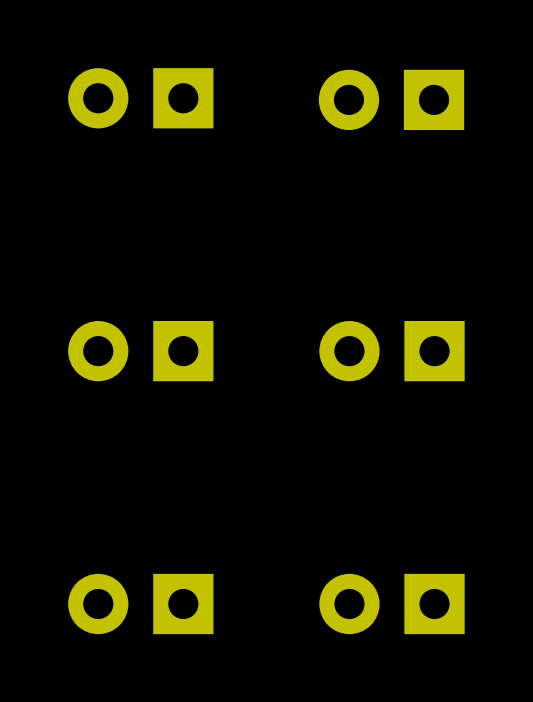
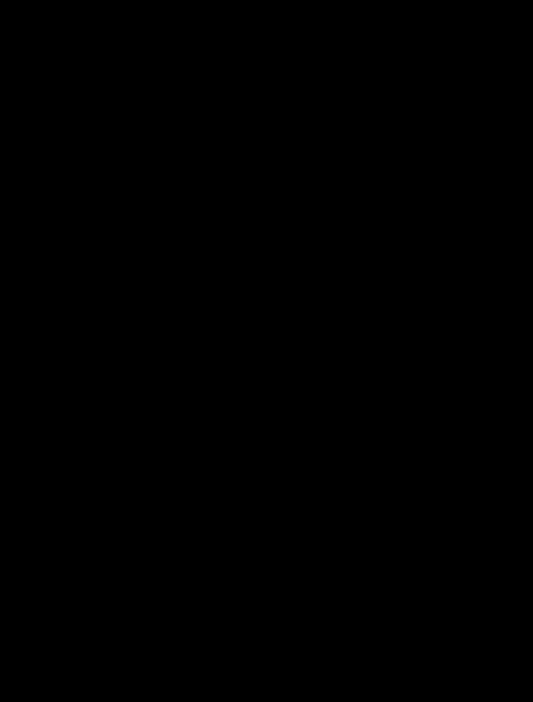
part: (140, 98) -> none
part: (391, 99) -> none
part: (140, 351) -> none
part: (392, 351) -> none
part: (140, 604) -> none
part: (392, 604) -> none

